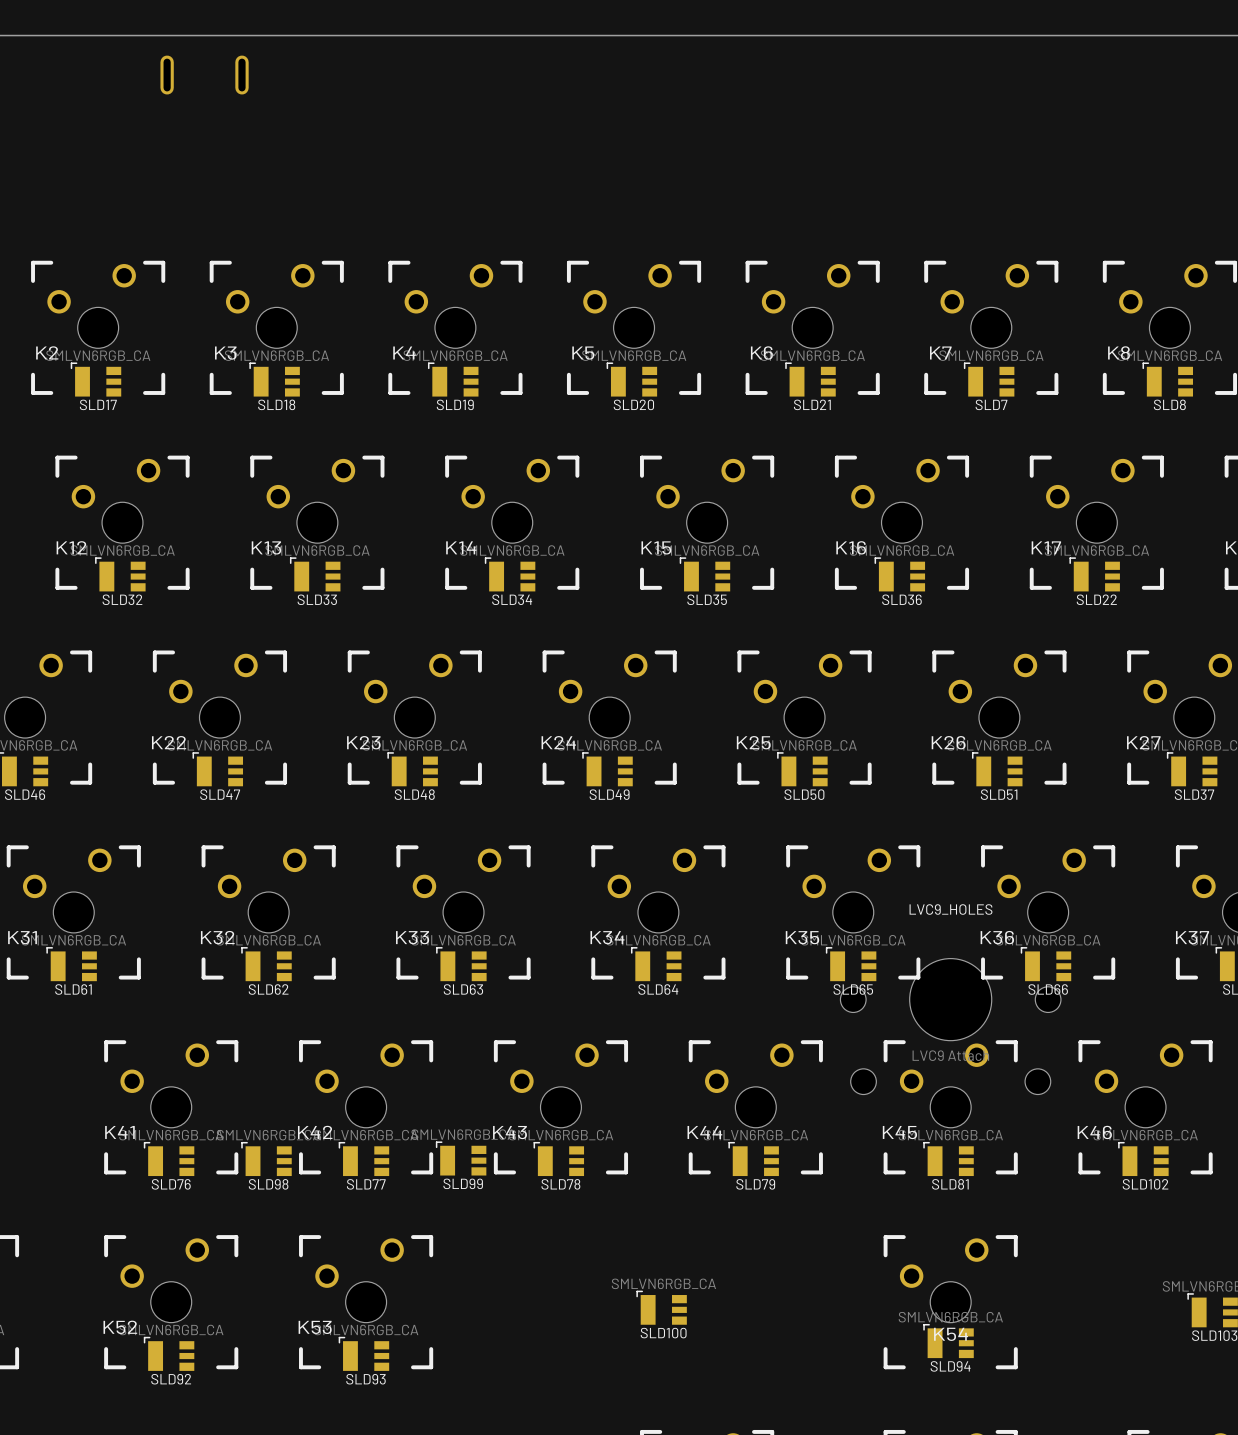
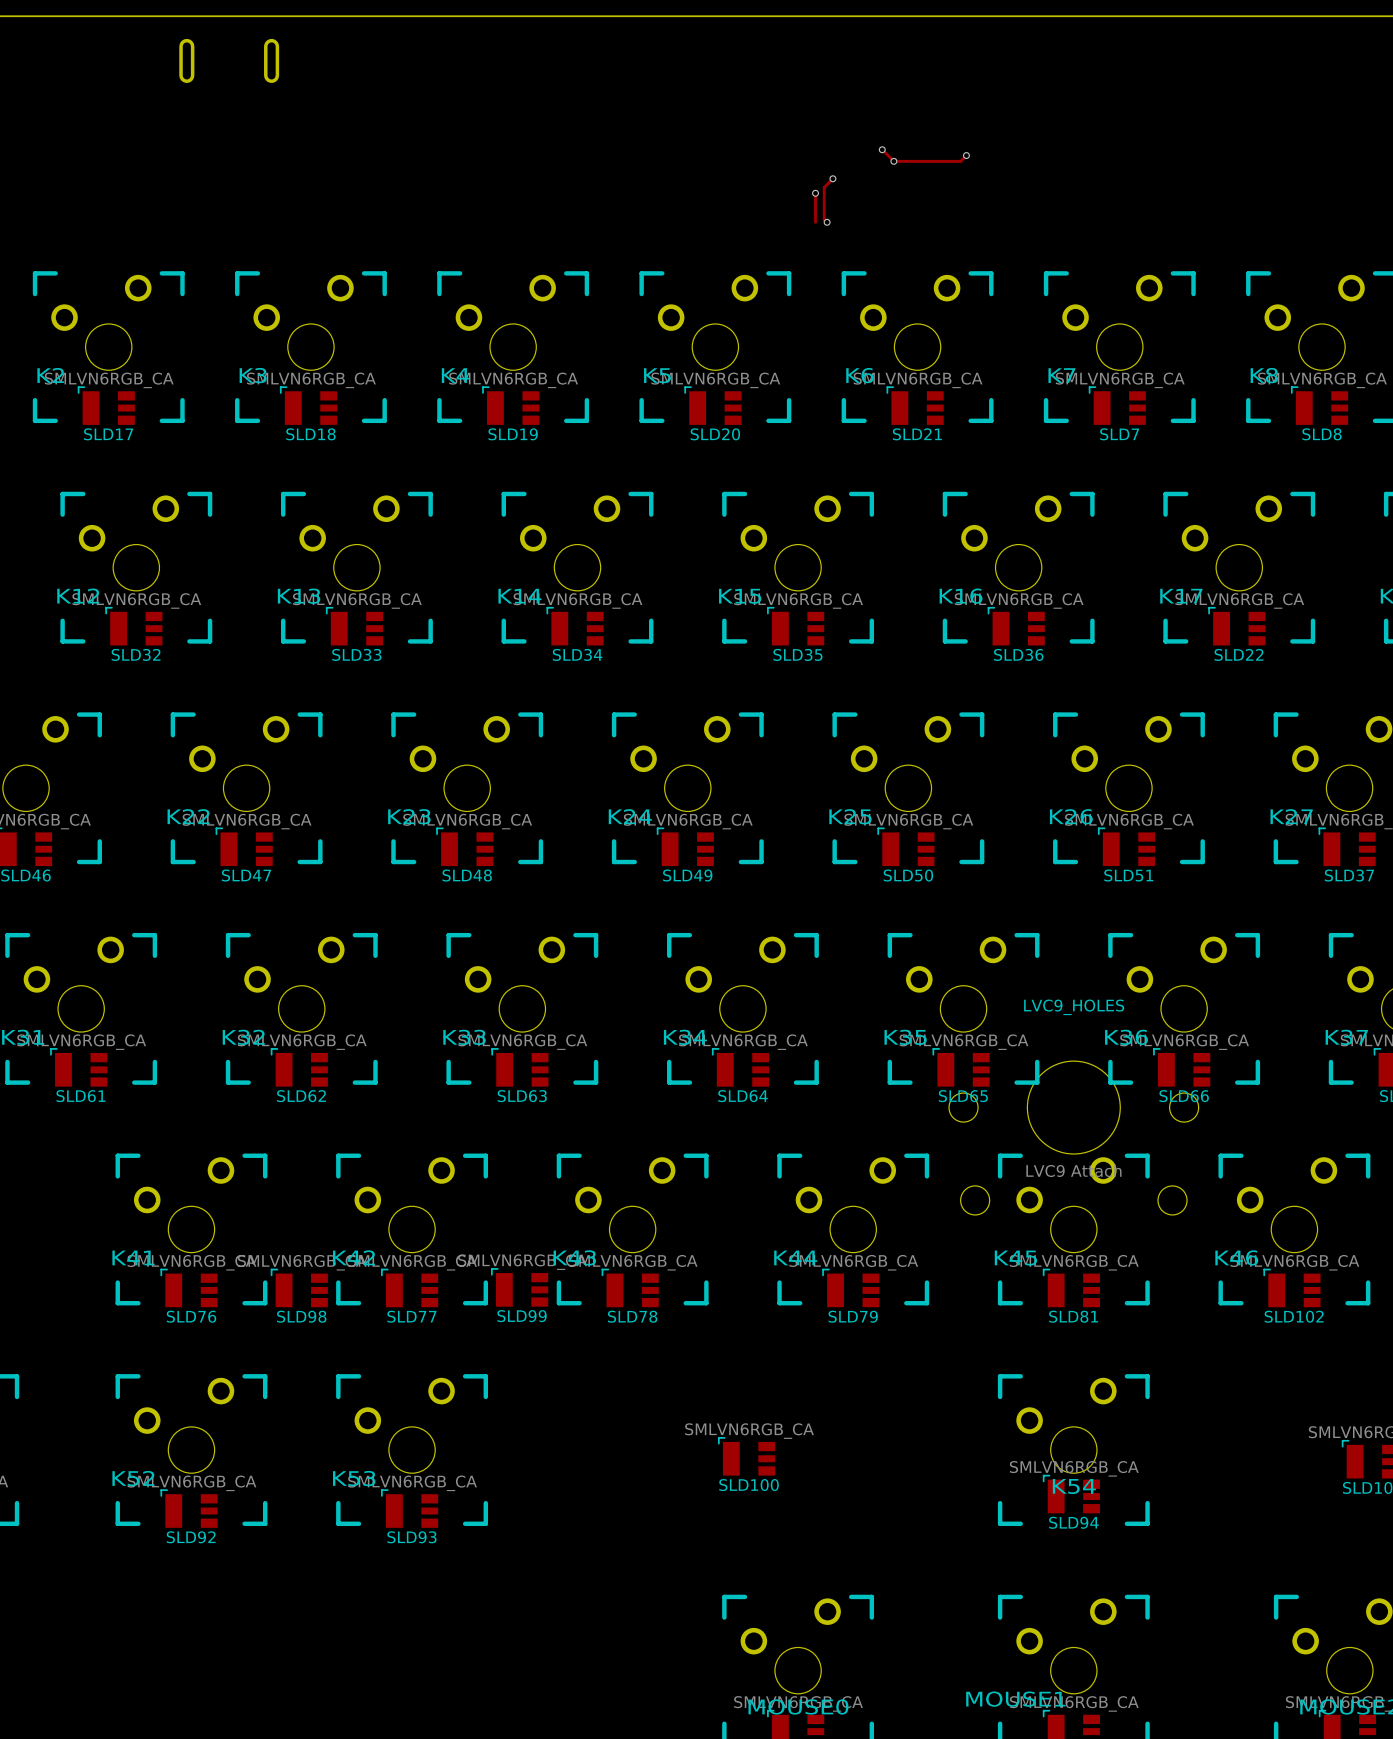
track: none -> (882, 149) (893, 161) (960, 161) (966, 155)
via: none -> (882, 149)
via: none -> (966, 155)
via: none -> (893, 161)
track: none -> (832, 178) (824, 187) (824, 219) (827, 222)
via: none -> (832, 178)
track: none -> (815, 193) (815, 222)
via: none -> (815, 193)
via: none -> (827, 222)

